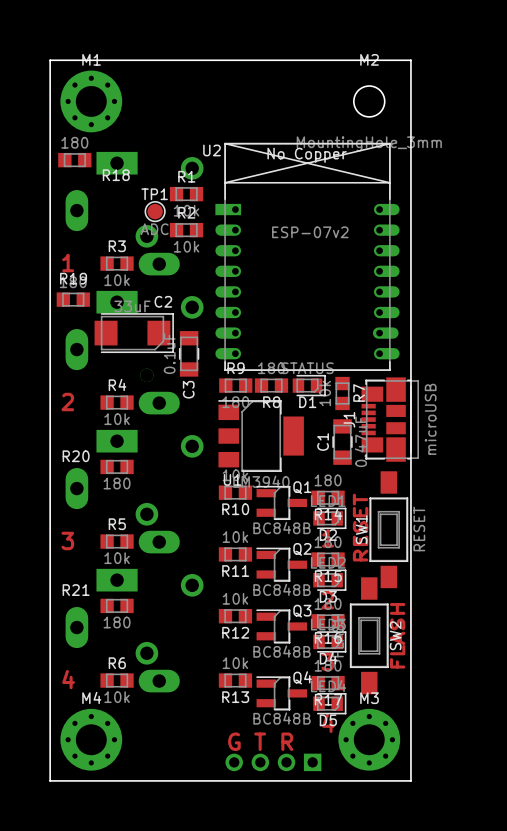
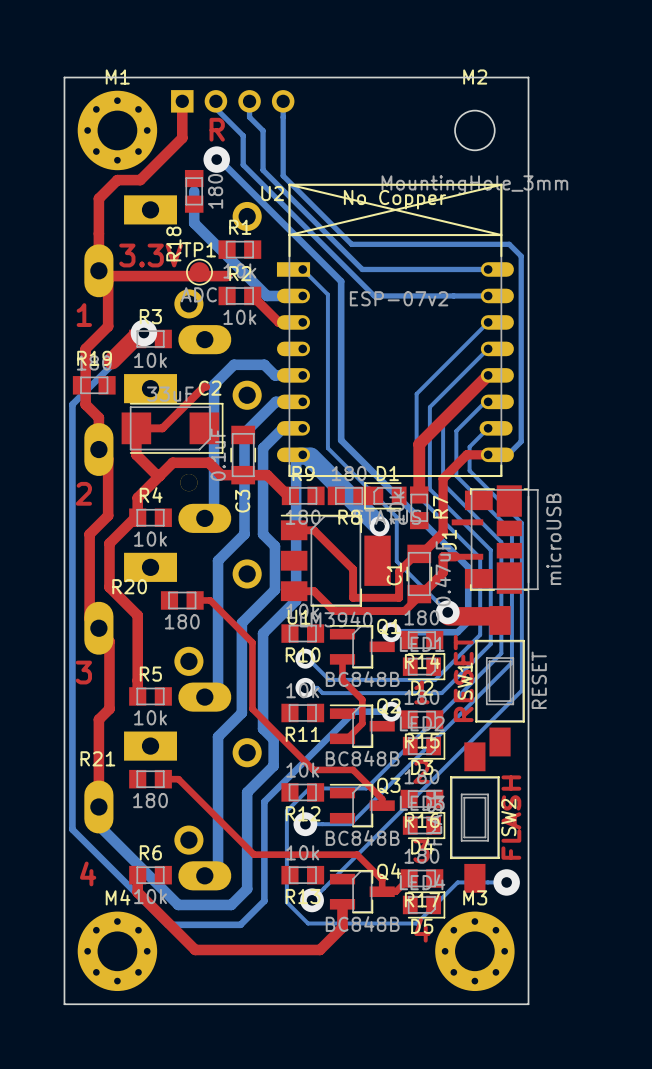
top track: none -> (182, 101) (182, 138) (140, 180) (117, 180) (98, 198) (98, 270)
bottom track: none -> (215, 101) (215, 108) (243, 135) (243, 164) (374, 295) (488, 295)
part: none -> (232, 101)
bottom track: none -> (249, 101) (249, 117) (263, 130) (263, 170) (362, 269) (488, 269)
bottom track: none -> (283, 101) (283, 175) (351, 244) (509, 244) (521, 256) (521, 441) (507, 454) (488, 454)
text: none -> R (217, 129)
bottom track: none -> (216, 159) (220, 159) (341, 281) (341, 440) (468, 567) (468, 621) (457, 632) (391, 632)
via: none -> (216, 159)
bottom track: none -> (194, 191) (194, 223) (267, 295) (302, 295)
R18 rotation: 0° (74, 160) -> 90° clockwise (194, 191)
R18 position: (74, 160) -> (194, 191)
text: none -> 3.3V (150, 255)
bottom track: none -> (302, 269) (327, 294) (327, 448) (396, 517) (396, 561) (447, 612)
top track: none -> (98, 270) (108, 280) (108, 326) (85, 348) (85, 404) (98, 417) (98, 449) (108, 458) (108, 515) (89, 534) (89, 618) (109, 641) (109, 709) (98, 719) (98, 806)
top track: none -> (100, 276) (227, 276)
top track: none -> (252, 296) (278, 322) (302, 322)
bottom track: none -> (488, 322) (416, 393) (416, 494) (480, 558) (480, 634) (435, 679) (329, 679) (308, 658) (305, 658)
top track: none -> (141, 331) (112, 360)
bottom track: none -> (143, 333) (72, 404) (72, 829) (167, 924) (240, 924) (264, 900) (264, 801) (354, 711) (391, 711)
via: none -> (143, 333)
text position: 1 (68, 263) -> 1 (84, 315)
bottom track: none -> (488, 348) (429, 407) (429, 489) (490, 550) (490, 644) (441, 693) (322, 693) (317, 687) (305, 687)
bottom track: none -> (302, 375) (274, 375) (264, 364) (233, 364) (214, 384) (214, 510)
top track: none -> (488, 375) (419, 444) (419, 494)
bottom track: none -> (488, 375) (443, 420) (443, 483) (501, 542) (501, 653) (366, 788) (309, 788) (286, 810) (286, 902) (308, 923) (416, 923) (457, 882) (506, 882)
top track: none -> (206, 386) (203, 386) (162, 428) (136, 428) (136, 454) (159, 476)
bottom track: none -> (302, 401) (275, 401) (244, 433) (244, 534) (218, 560) (218, 697)
bottom track: none -> (488, 401) (485, 401) (456, 430) (456, 476) (511, 531) (511, 662) (350, 824) (305, 824)
bottom track: none -> (302, 428) (282, 428) (263, 448) (263, 534) (274, 546) (274, 589) (241, 622) (241, 712) (218, 736) (218, 874)
bottom track: none -> (488, 428) (469, 446) (469, 470) (521, 523) (521, 690) (312, 900)
bottom track: none -> (302, 454) (296, 461) (296, 600) (263, 633) (263, 728) (273, 739) (273, 765) (247, 792) (247, 889) (231, 904) (178, 904) (98, 825) (98, 806)
top track: none -> (488, 454) (466, 454) (443, 478) (443, 532) (421, 553)
bottom track: none -> (310, 457) (379, 526) (378, 527)
J1 footprint: [361, 377, 419, 462] -> [451, 485, 539, 594]
top track: none -> (287, 495) (267, 475) (221, 475) (208, 462) (172, 462) (137, 497) (137, 517)
D1 rotation: 0° (309, 385) -> 180° (385, 495)
R7 position: (342, 393) -> (419, 507)
text position: 2 (67, 402) -> 2 (83, 493)
top track: none -> (137, 517) (109, 543) (109, 587) (137, 615) (137, 696)
via: none -> (379, 526)
top track: none -> (294, 530) (314, 530) (353, 569) (353, 597) (399, 597) (399, 571) (416, 553) (419, 553)
top track: none -> (455, 556) (443, 556) (443, 572) (421, 594)
C1 position: (342, 442) -> (419, 573)
top track: none -> (294, 591) (314, 591) (333, 611) (404, 611) (419, 596) (419, 594)
R20 position: (117, 466) -> (182, 600)
top track: none -> (195, 600) (210, 600) (252, 642) (252, 709) (313, 769) (353, 769) (382, 799) (382, 805)
via: none -> (447, 612)
top track: none -> (448, 616) (497, 616)
via: none -> (391, 632)
via: none -> (305, 658)
top track: none -> (342, 659) (342, 679) (362, 699) (362, 723) (347, 738) (342, 738) (345, 738)
via: none -> (305, 687)
text position: 3 (67, 540) -> 3 (83, 672)
via: none -> (391, 711)
top track: none -> (163, 779) (178, 779) (253, 854) (357, 854) (382, 879) (382, 891) (395, 891) (409, 878)
via: none -> (305, 824)
top track: none -> (137, 875) (137, 892) (195, 949) (319, 949) (342, 927) (342, 904)
via: none -> (506, 882)
via: none -> (312, 900)
text: G (234, 741) -> none
text: T (260, 741) -> none
text: R (287, 741) -> none
part: (273, 762) -> none

